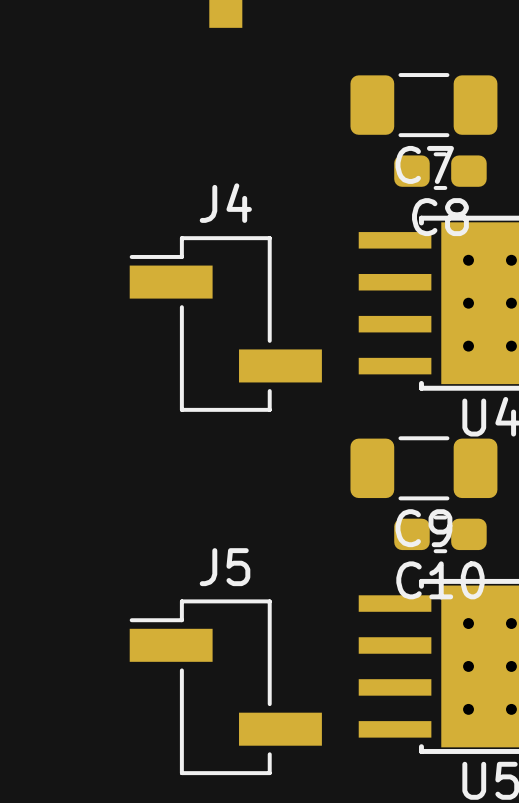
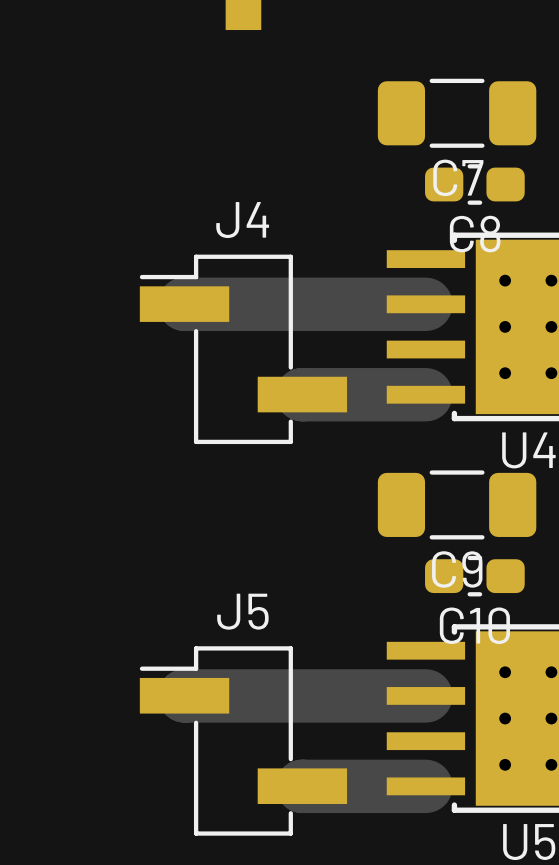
track: none -> (184, 304) (425, 304)
track: none -> (302, 394) (425, 394)
track: none -> (184, 695) (425, 695)
track: none -> (302, 786) (425, 786)

